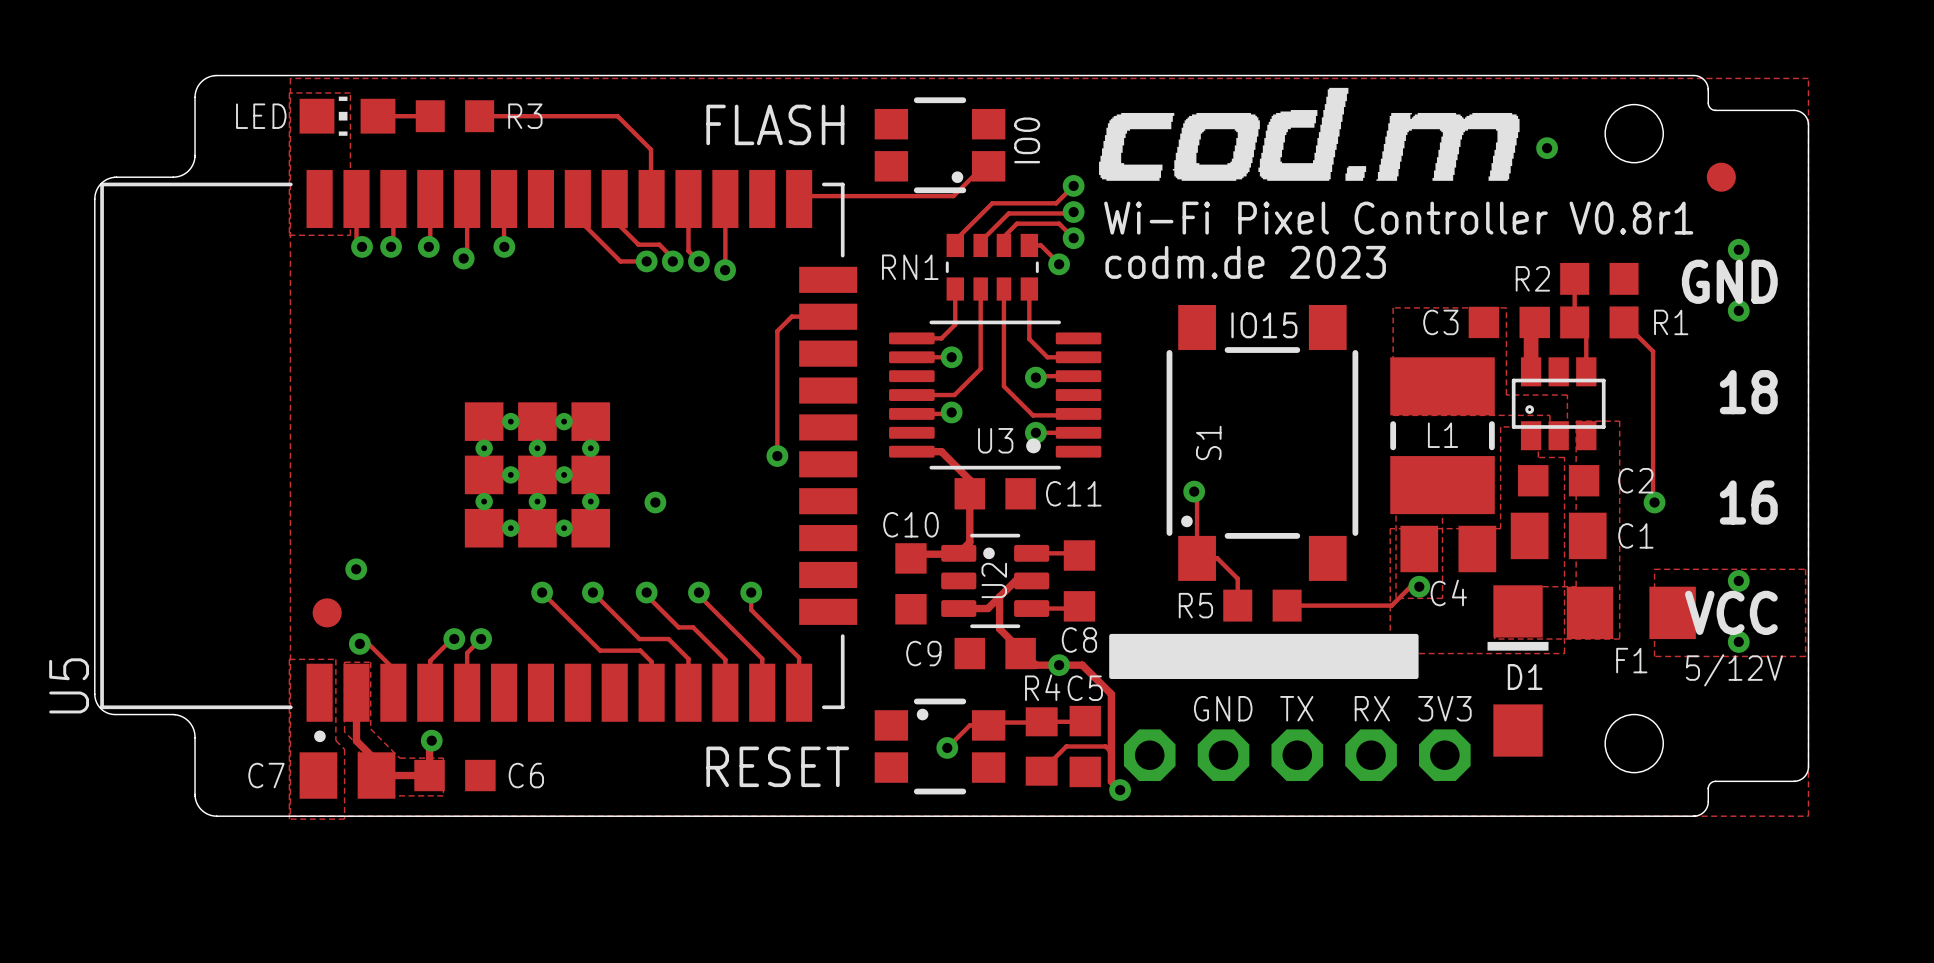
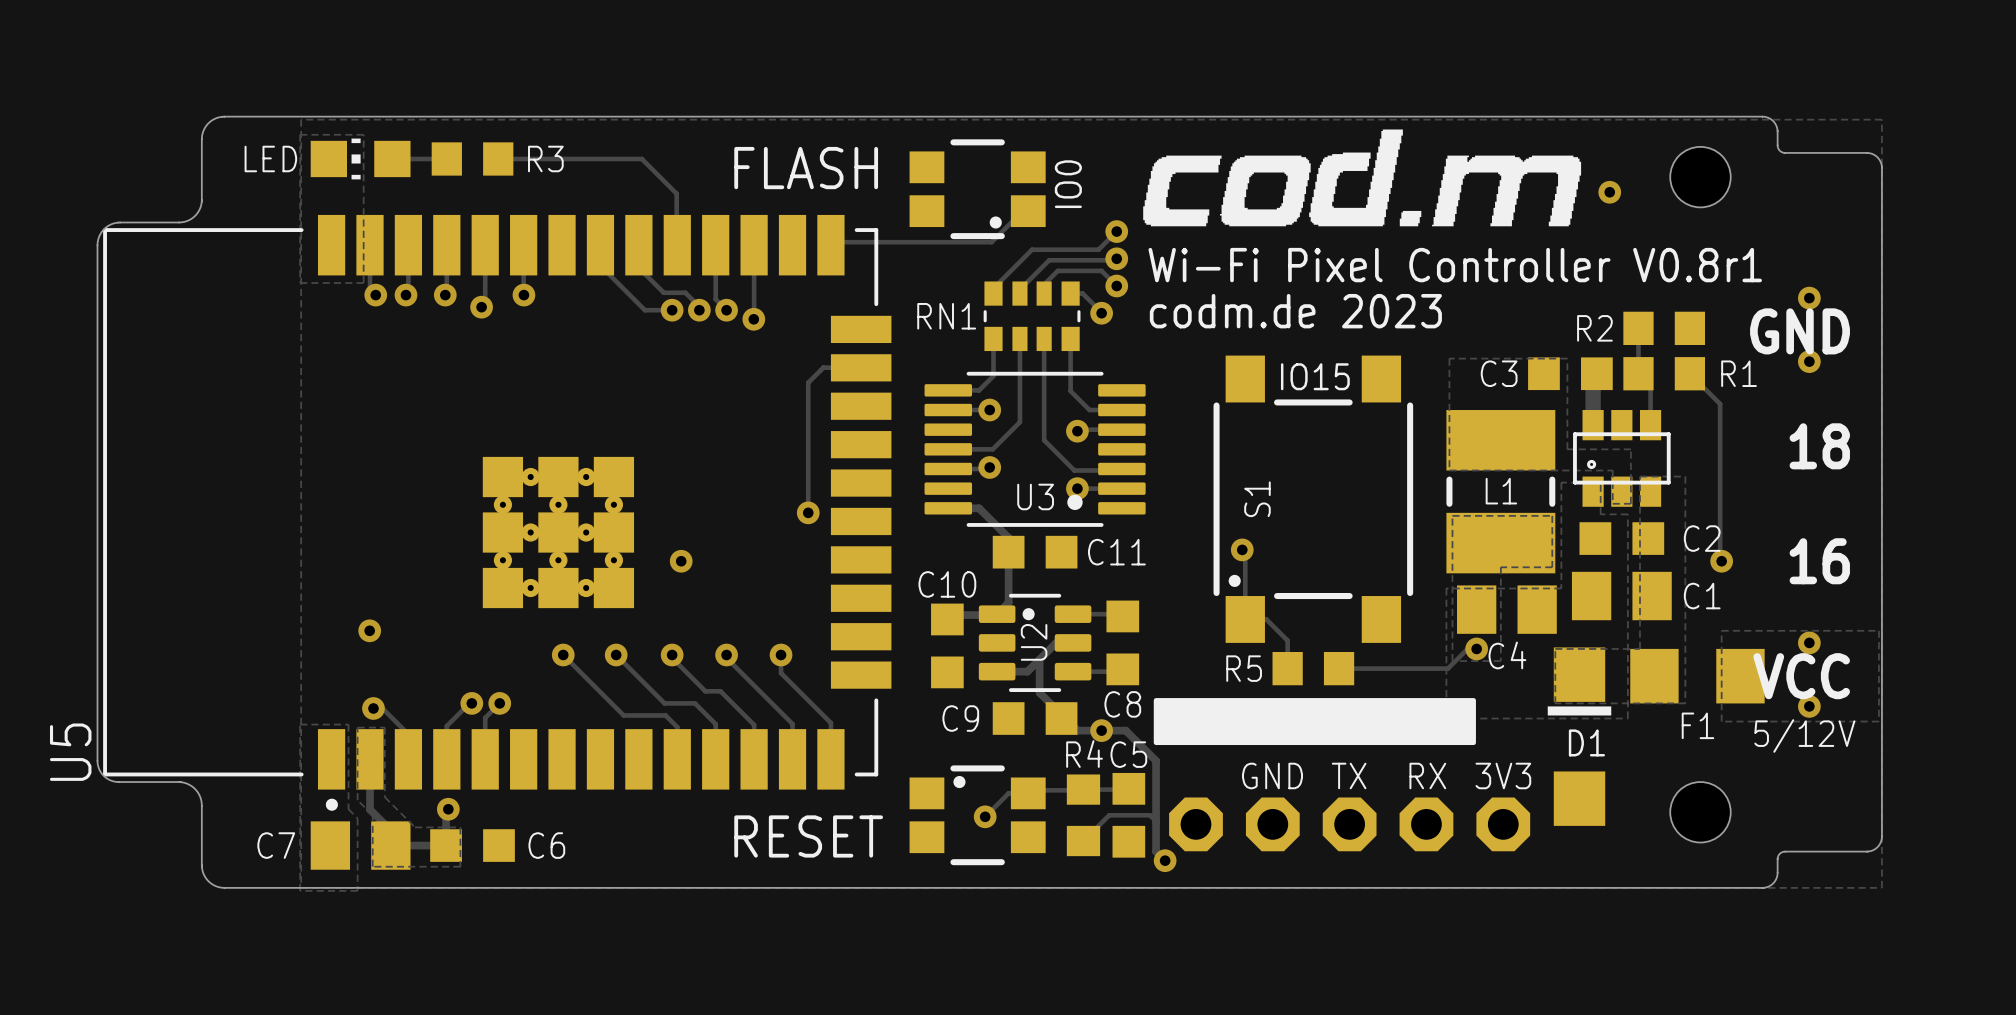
part: (1721, 177) -> none
part: (327, 612) -> none

